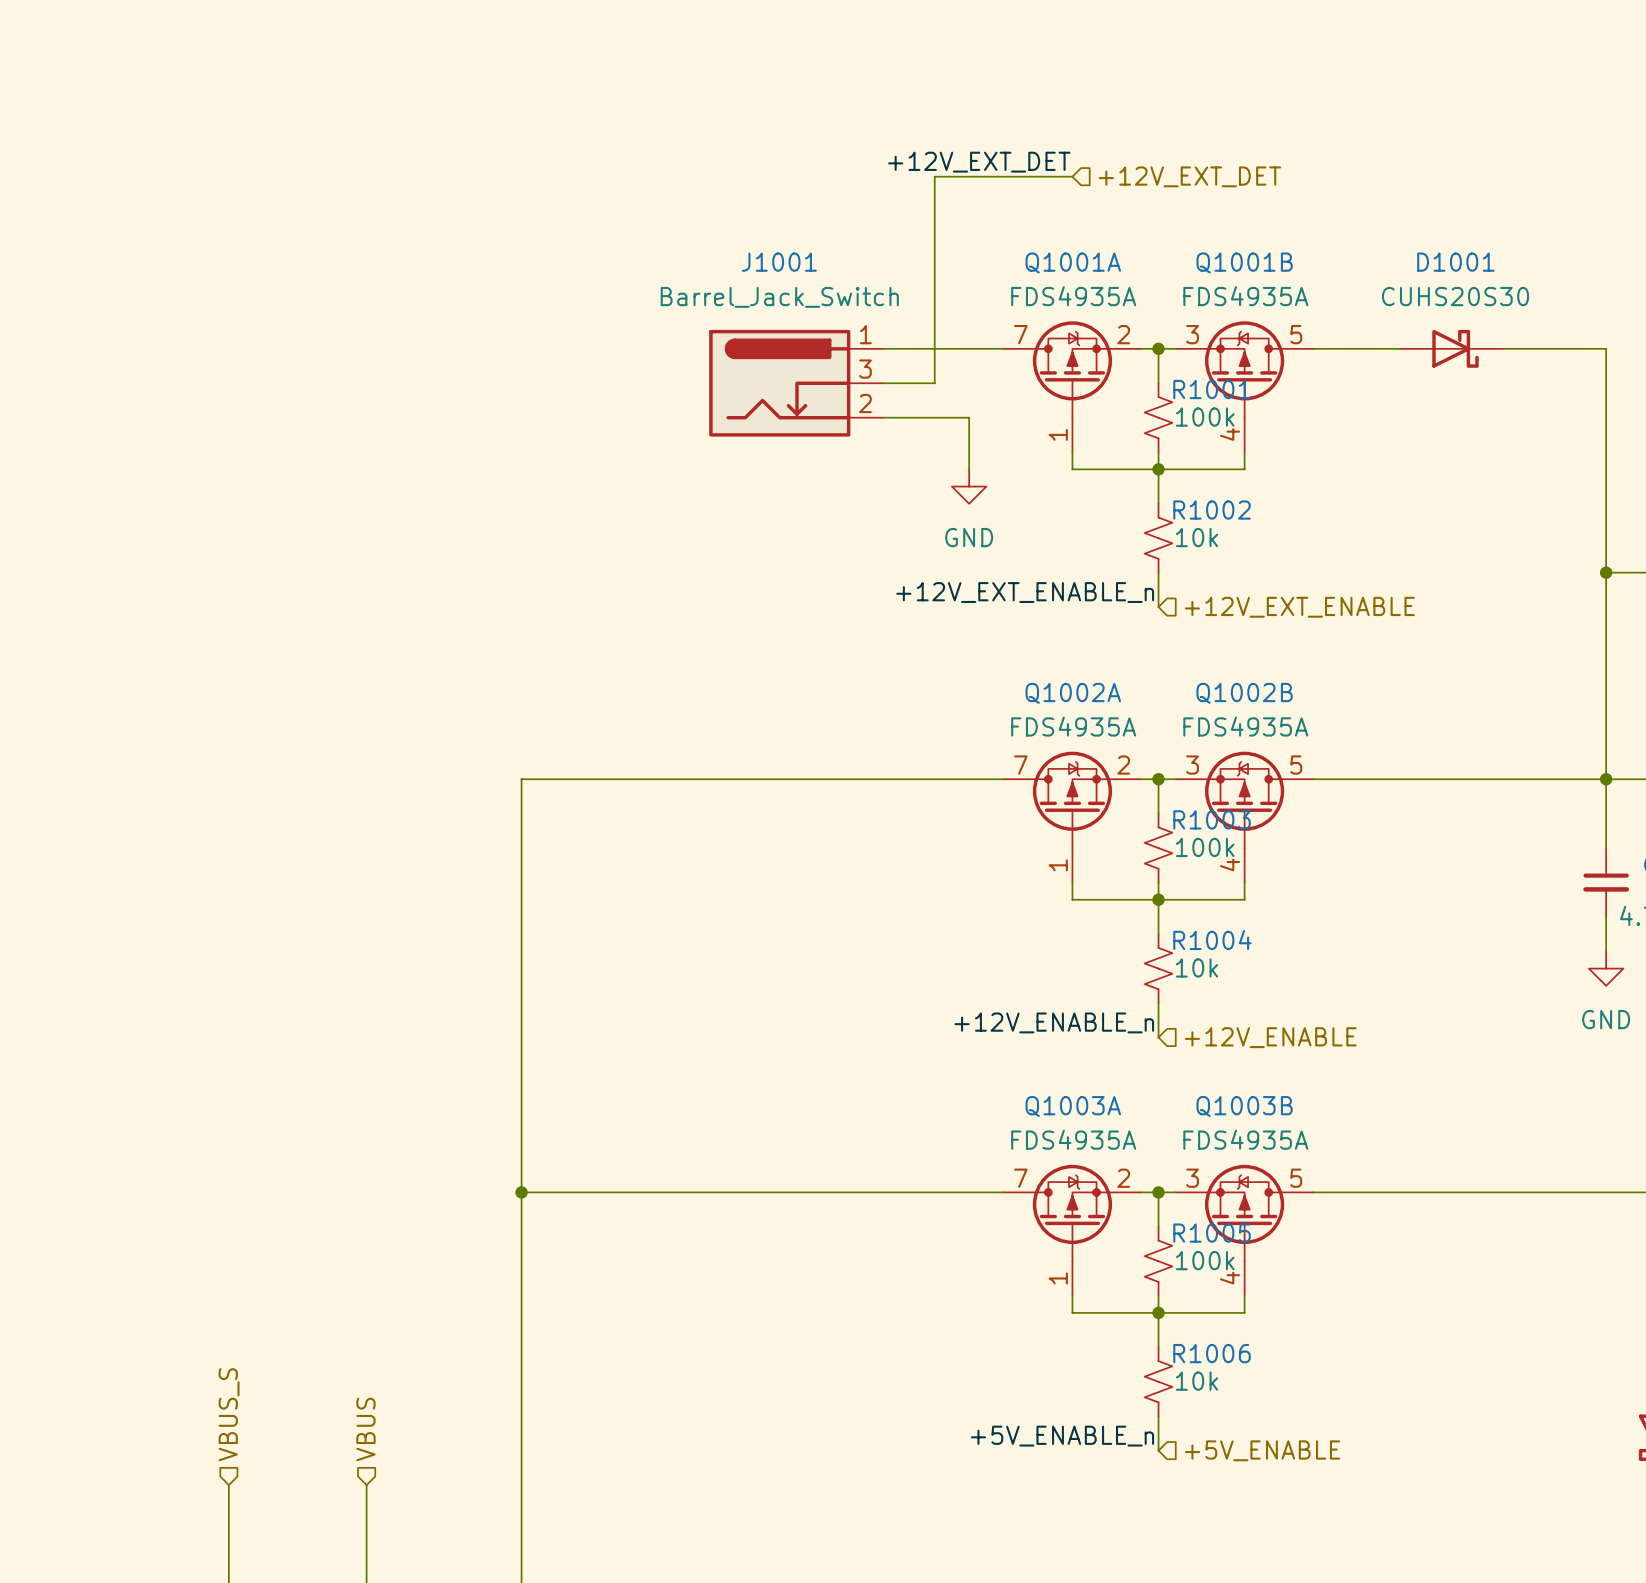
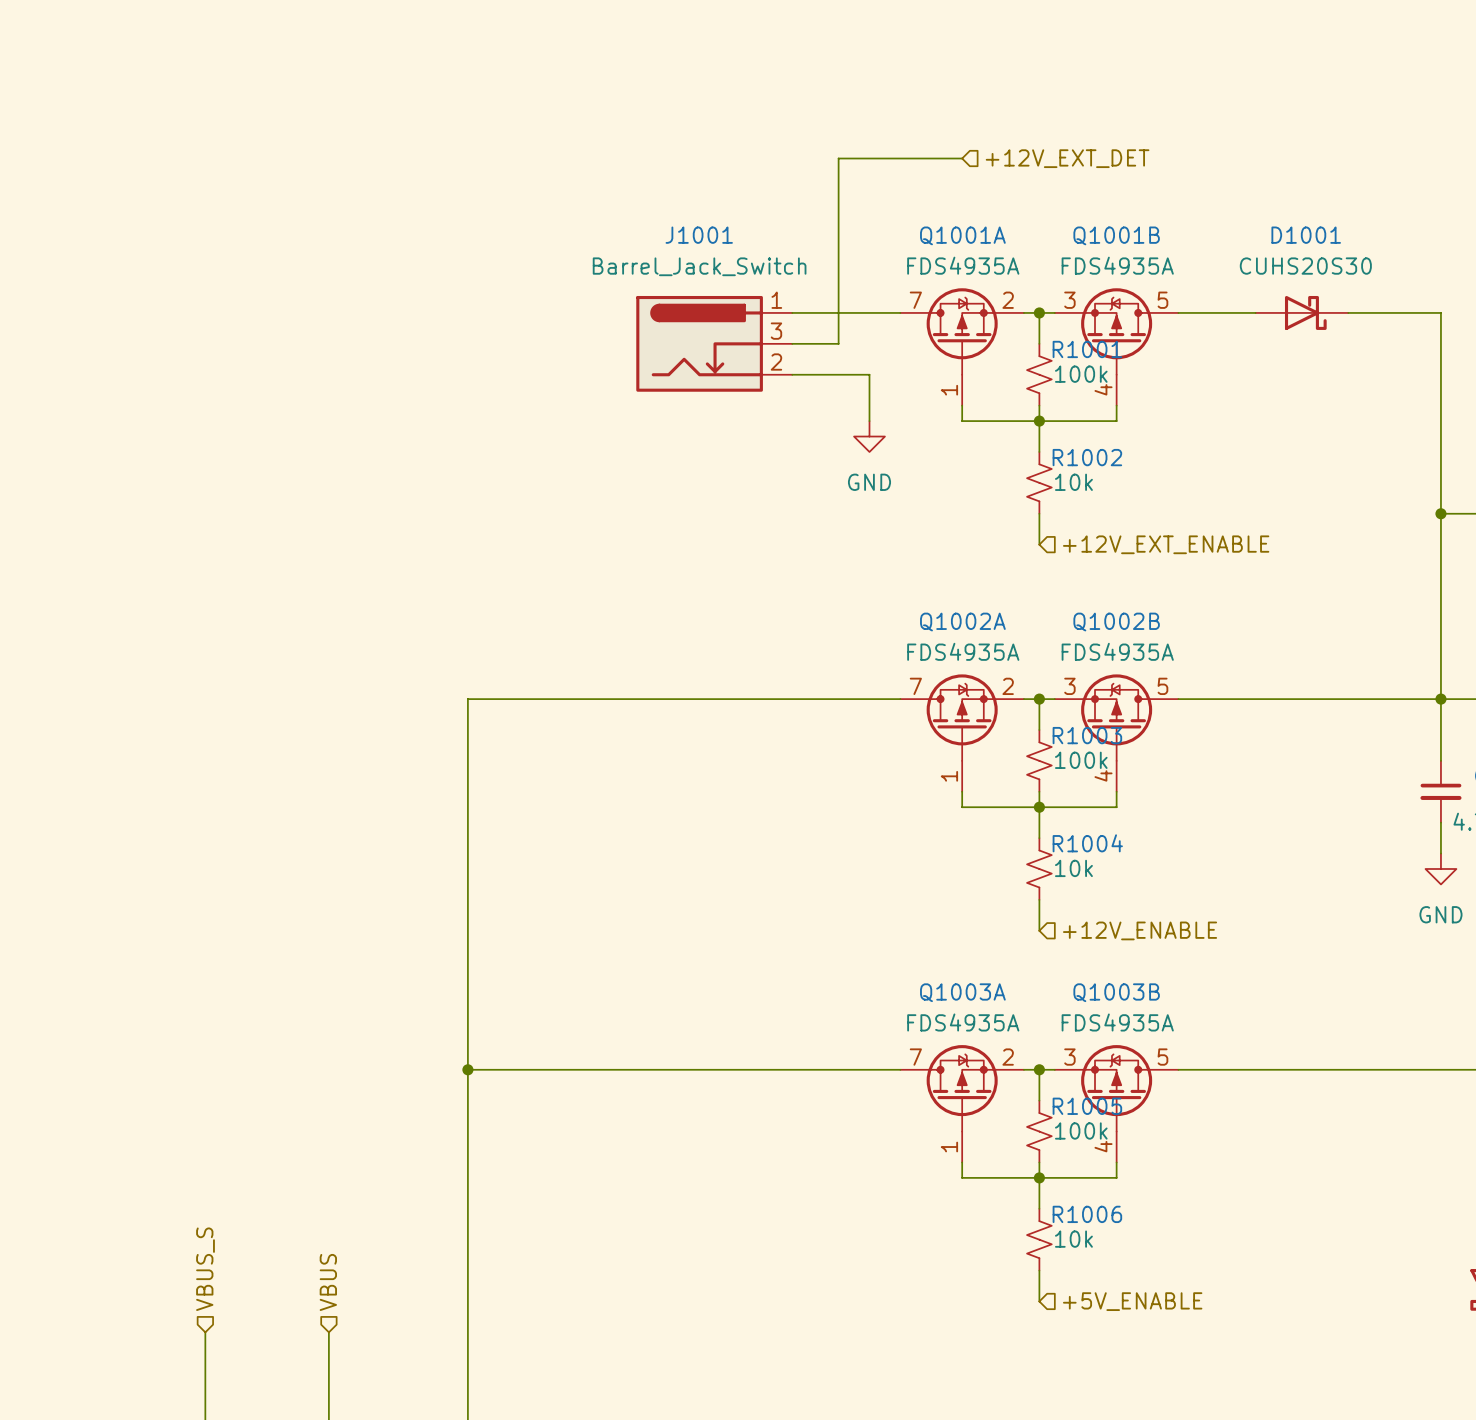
label: +12V_EXT_DET (979, 162) -> none
label: +12V_EXT_ENABLE_n (1025, 592) -> none
label: +12V_ENABLE_n (1054, 1022) -> none
label: +5V_ENABLE_n (1062, 1436) -> none

